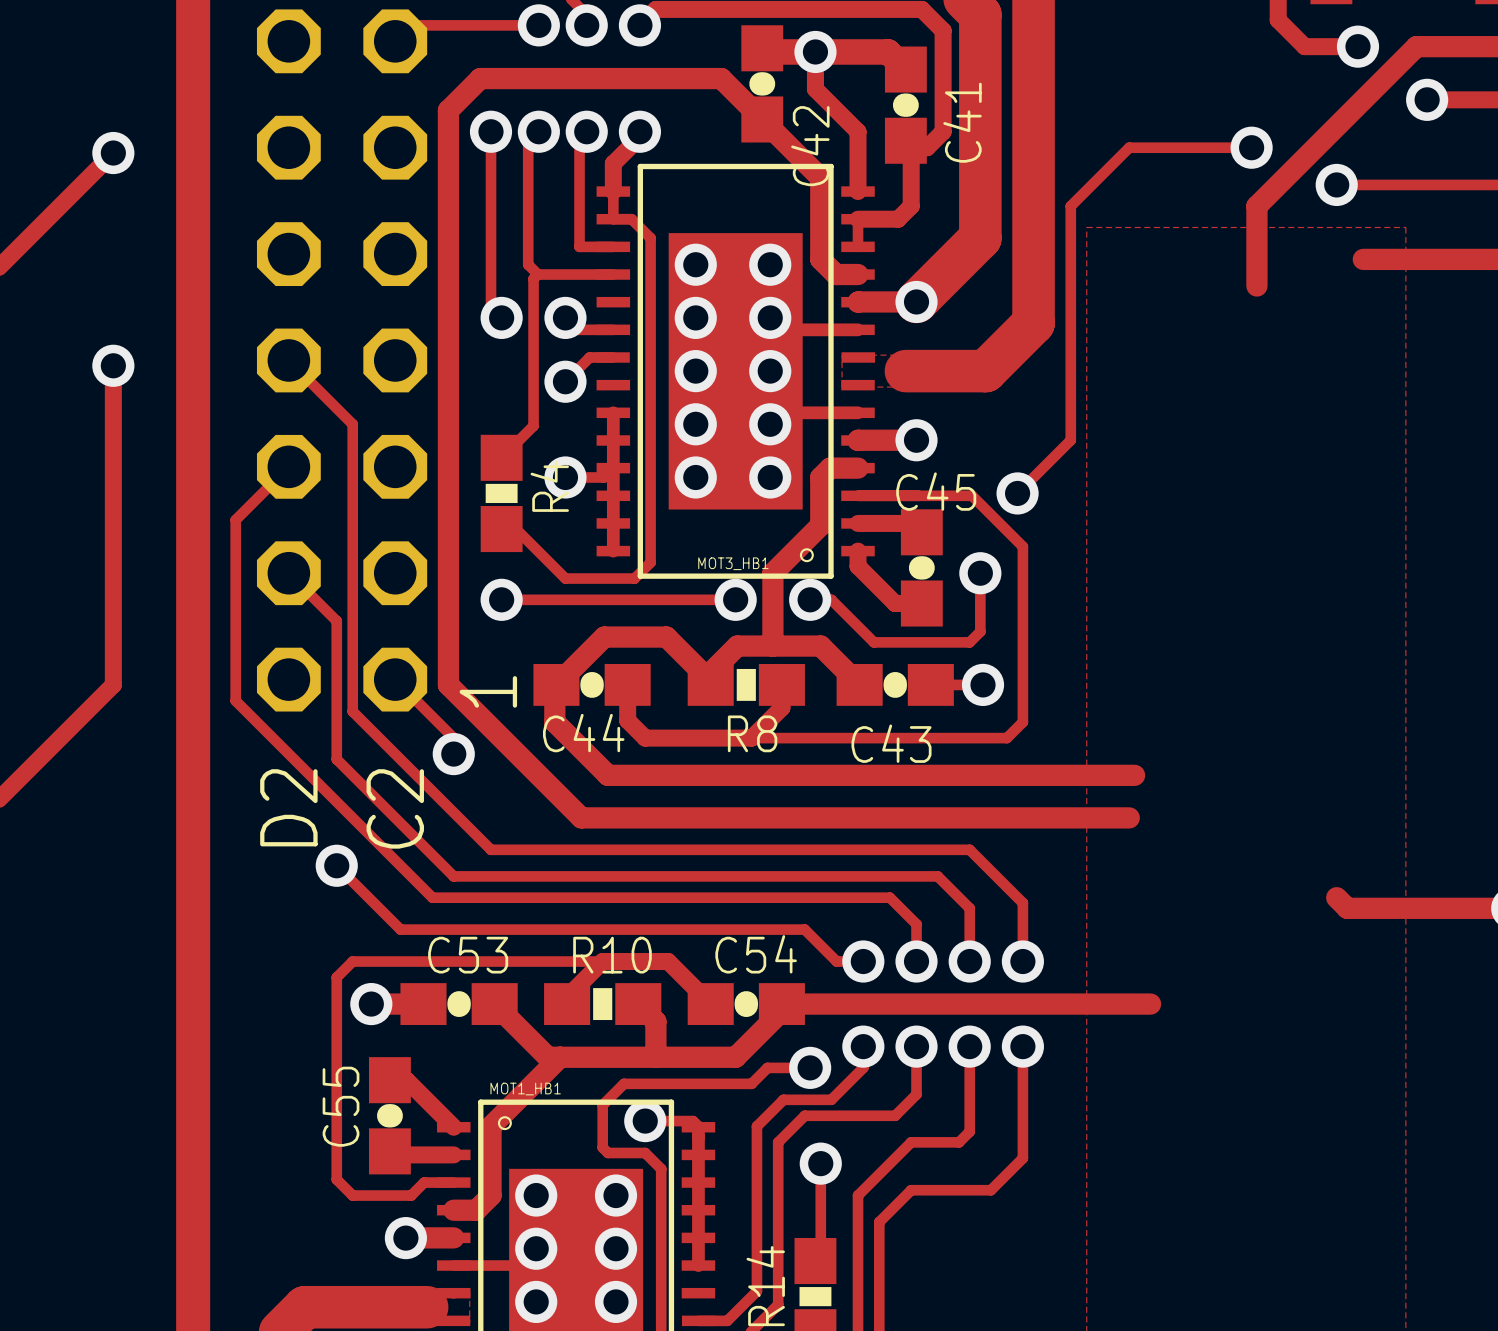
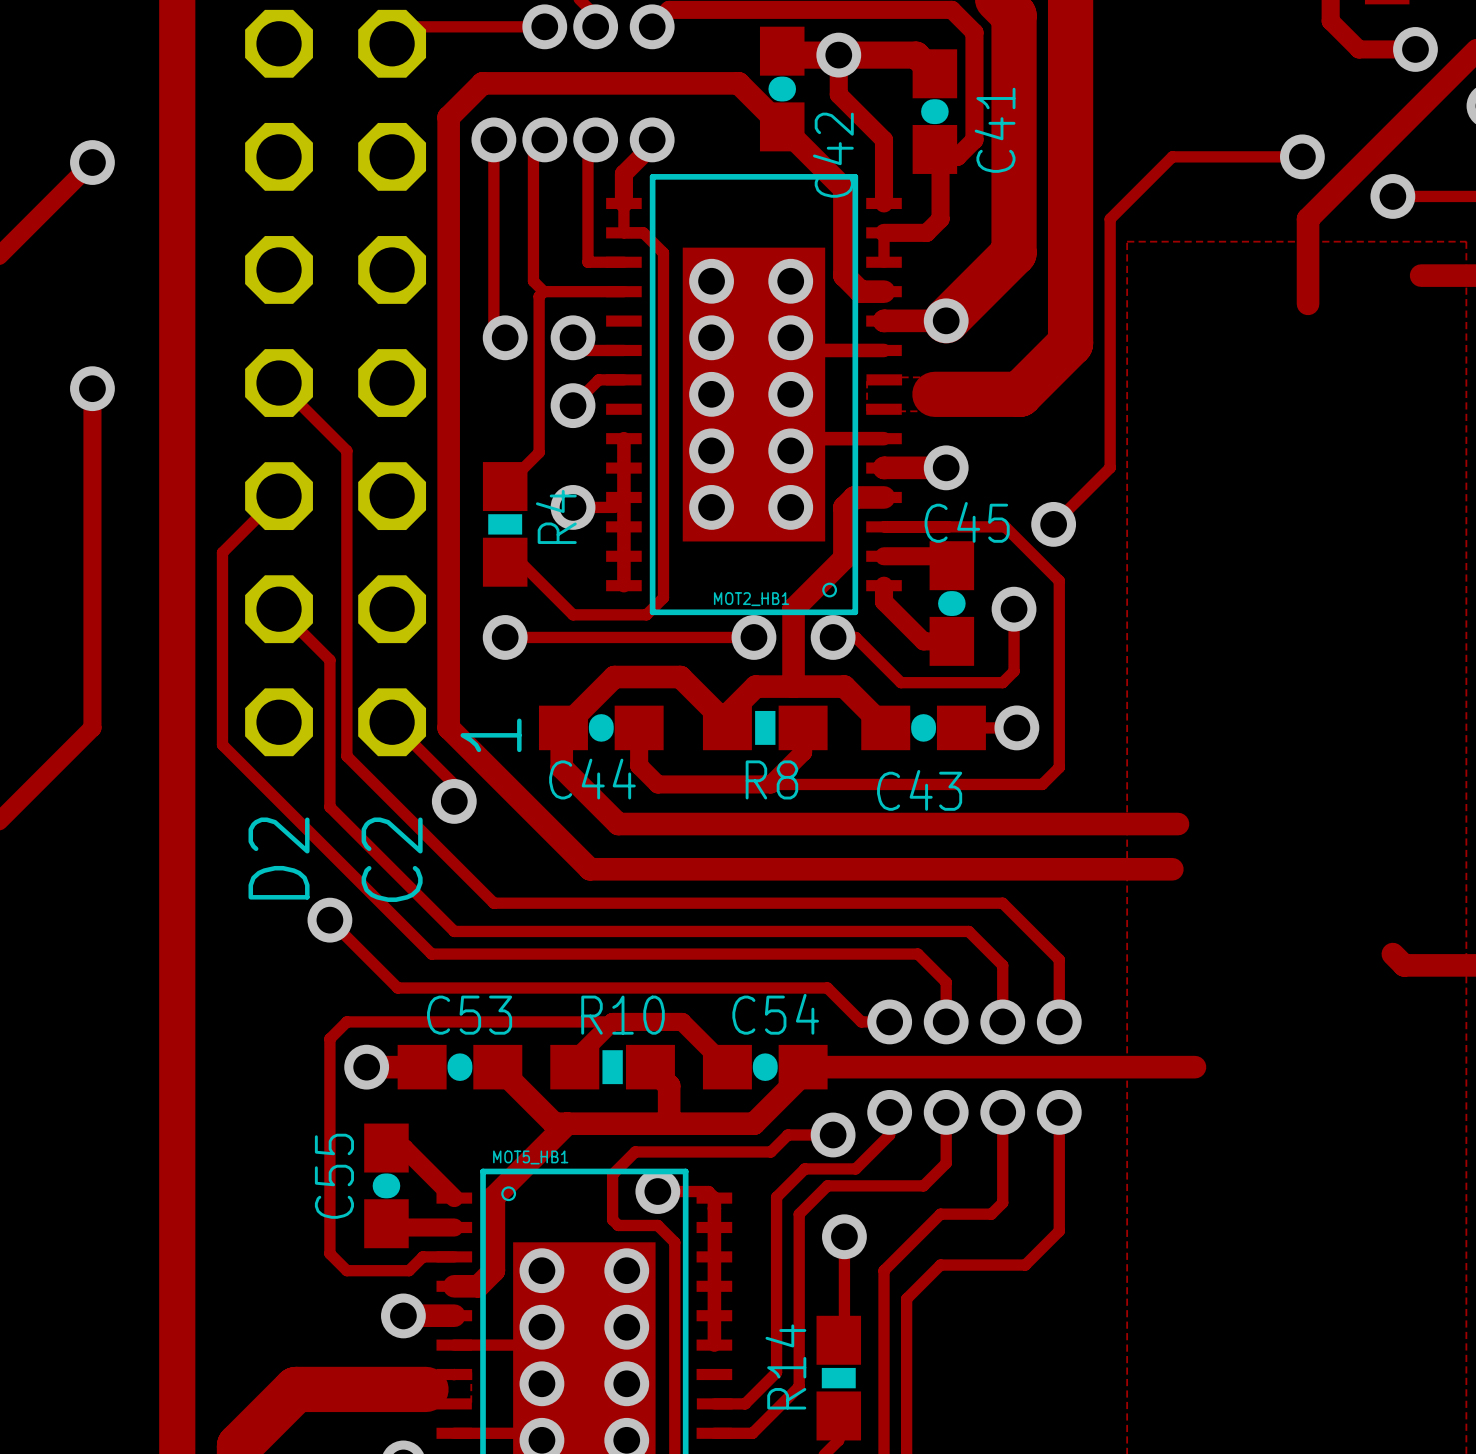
MOT3_HB1 name: MOT3_HB1 (733, 563) -> MOT2_HB1 (751, 599)
MOT1_HB1 name: MOT1_HB1 (525, 1089) -> MOT5_HB1 (530, 1157)

